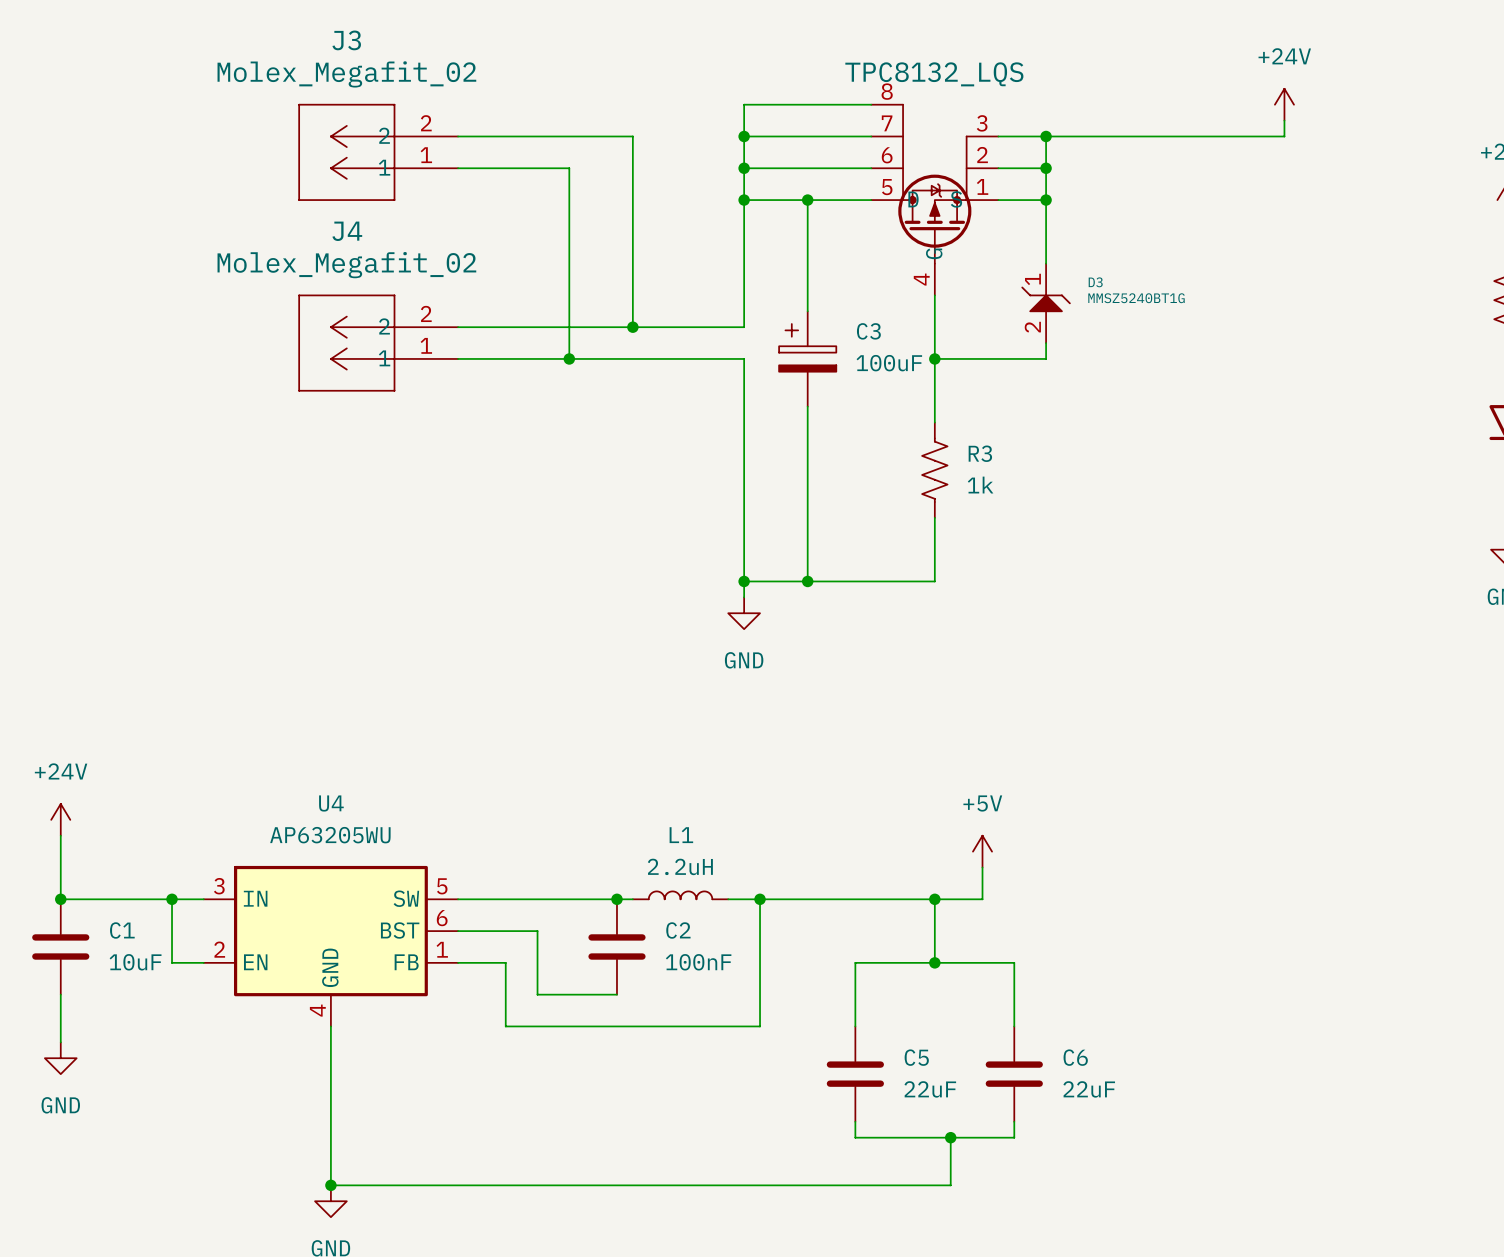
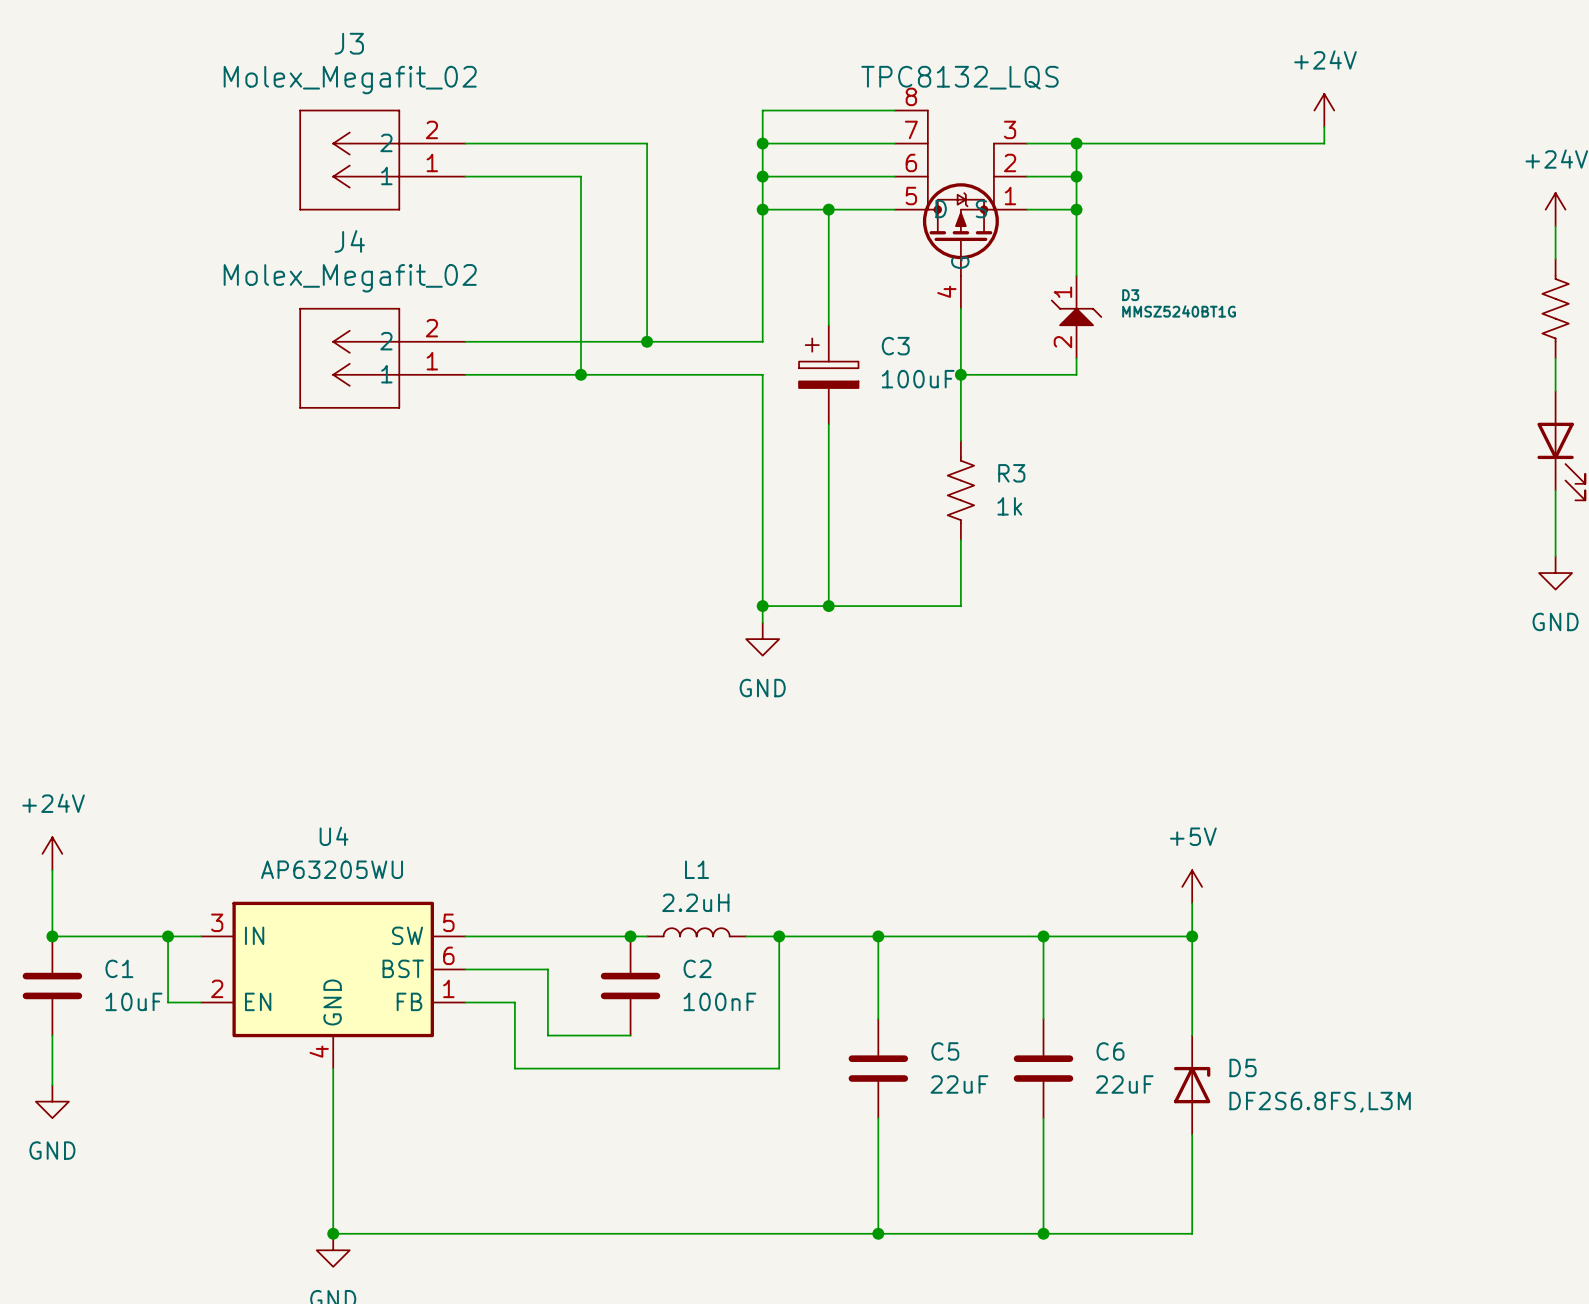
power symbol position: +5V (982, 851) -> +5V (1192, 886)
wire: (982, 867) (982, 899) -> (1192, 936) (1010, 936)
wire: none -> (1192, 903) (1192, 1035)
junction: none -> (878, 936)
wire: (934, 899) (934, 962) -> (1043, 936) (1043, 1002)
junction: (934, 899) -> none
junction: none -> (1043, 936)
junction: none -> (1192, 936)
wire: (855, 962) (1014, 962) -> (878, 1002) (878, 936)
junction: (934, 962) -> none
D5: none -> DF2S6.8FS,L3M (1192, 1085)
C5 position: (855, 1074) -> (878, 1068)
C6 position: (1014, 1074) -> (1043, 1068)
wire: (855, 1137) (1014, 1137) -> (878, 1184) (878, 1233)
wire: (950, 1137) (950, 1185) -> (1192, 1134) (1192, 1233) (977, 1233)
junction: (950, 1137) -> none
wire: none -> (1043, 1184) (1043, 1233)
junction: none -> (878, 1233)
junction: none -> (1043, 1233)

